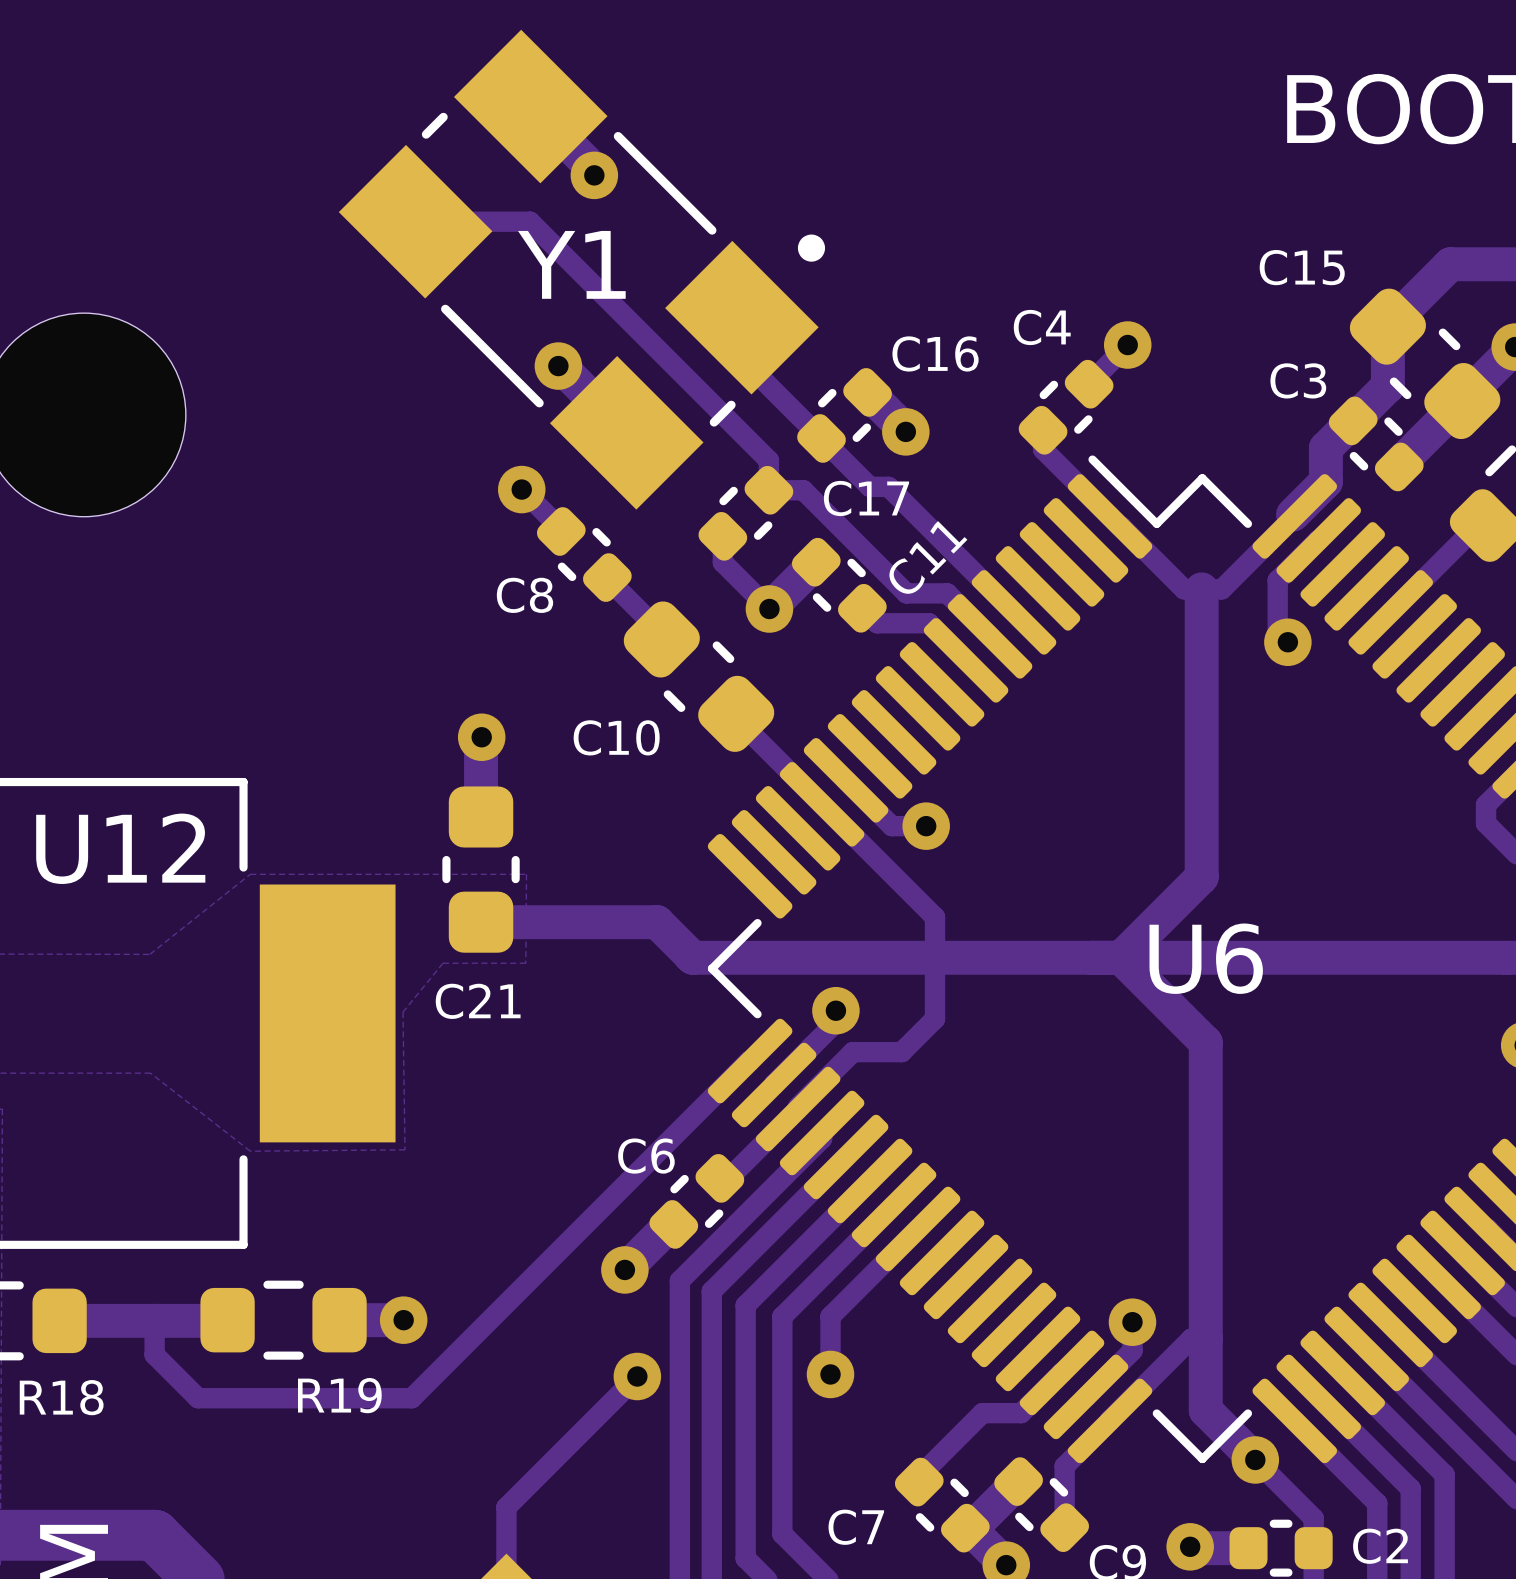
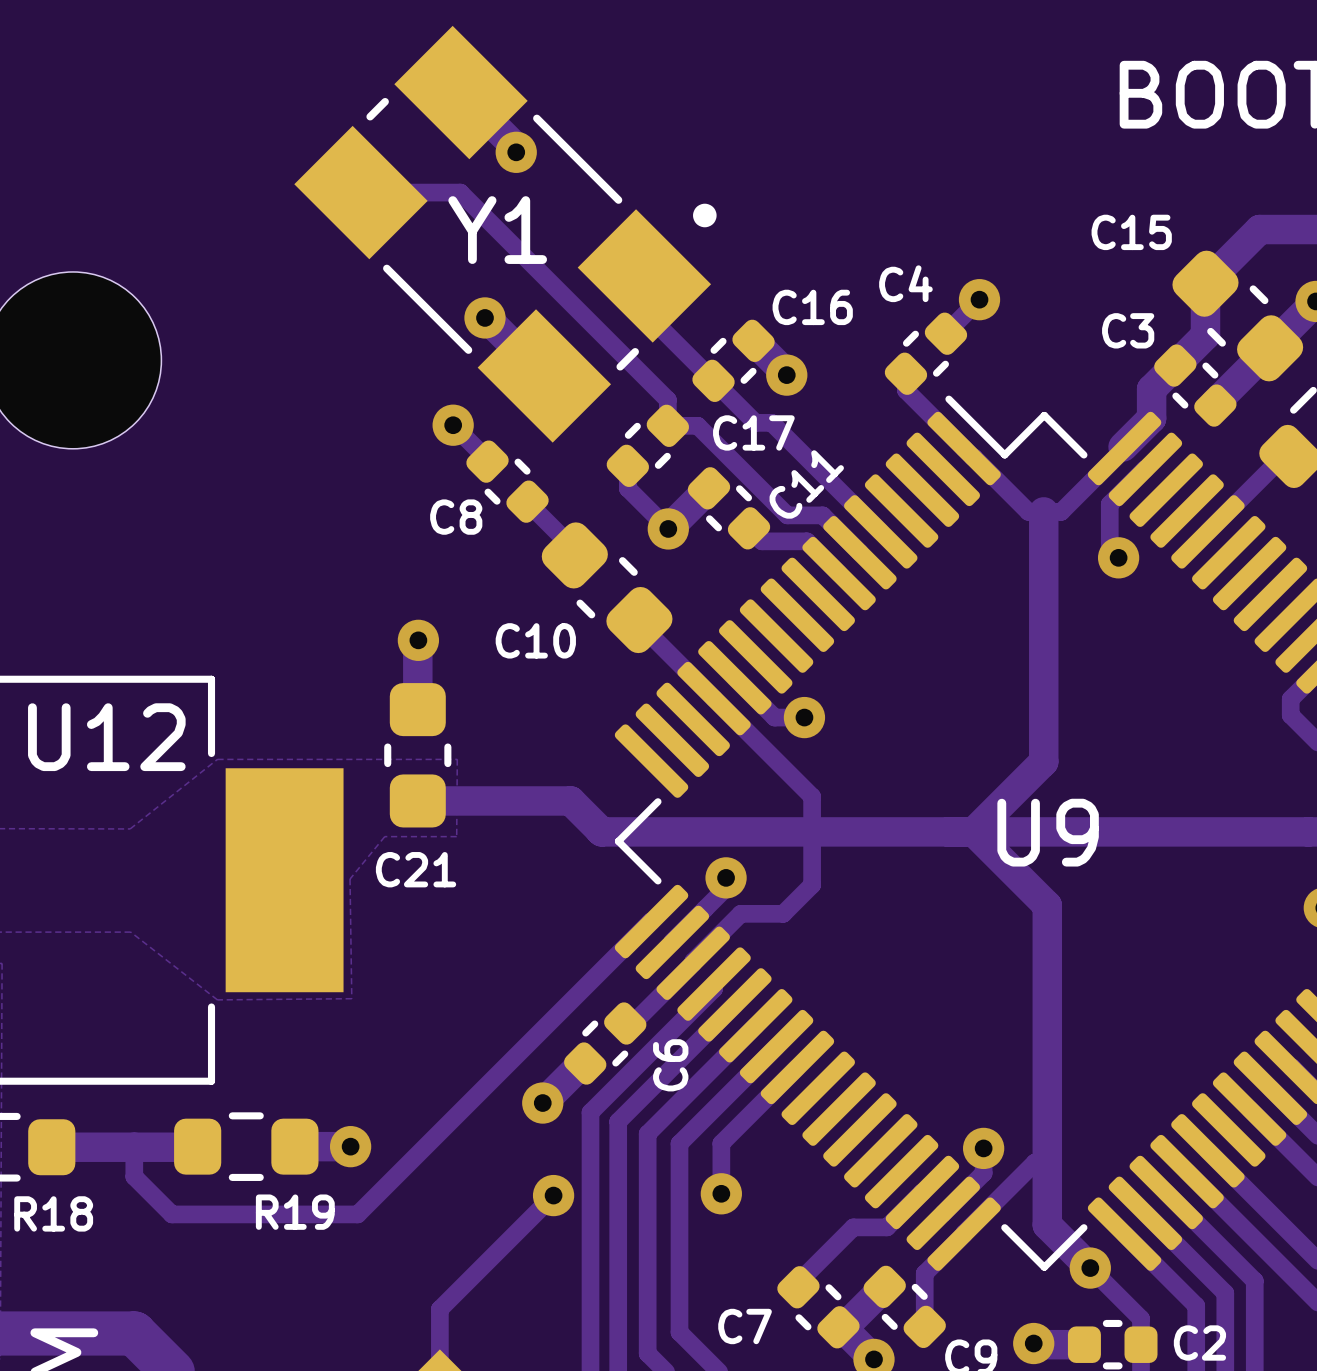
U6 name: U6 (1206, 958) -> U9 (1048, 832)
C6 name rotation: 0° (646, 1156) -> 90° counterclockwise (670, 1065)
C6 name position: C6 (646, 1156) -> C6 (670, 1065)

